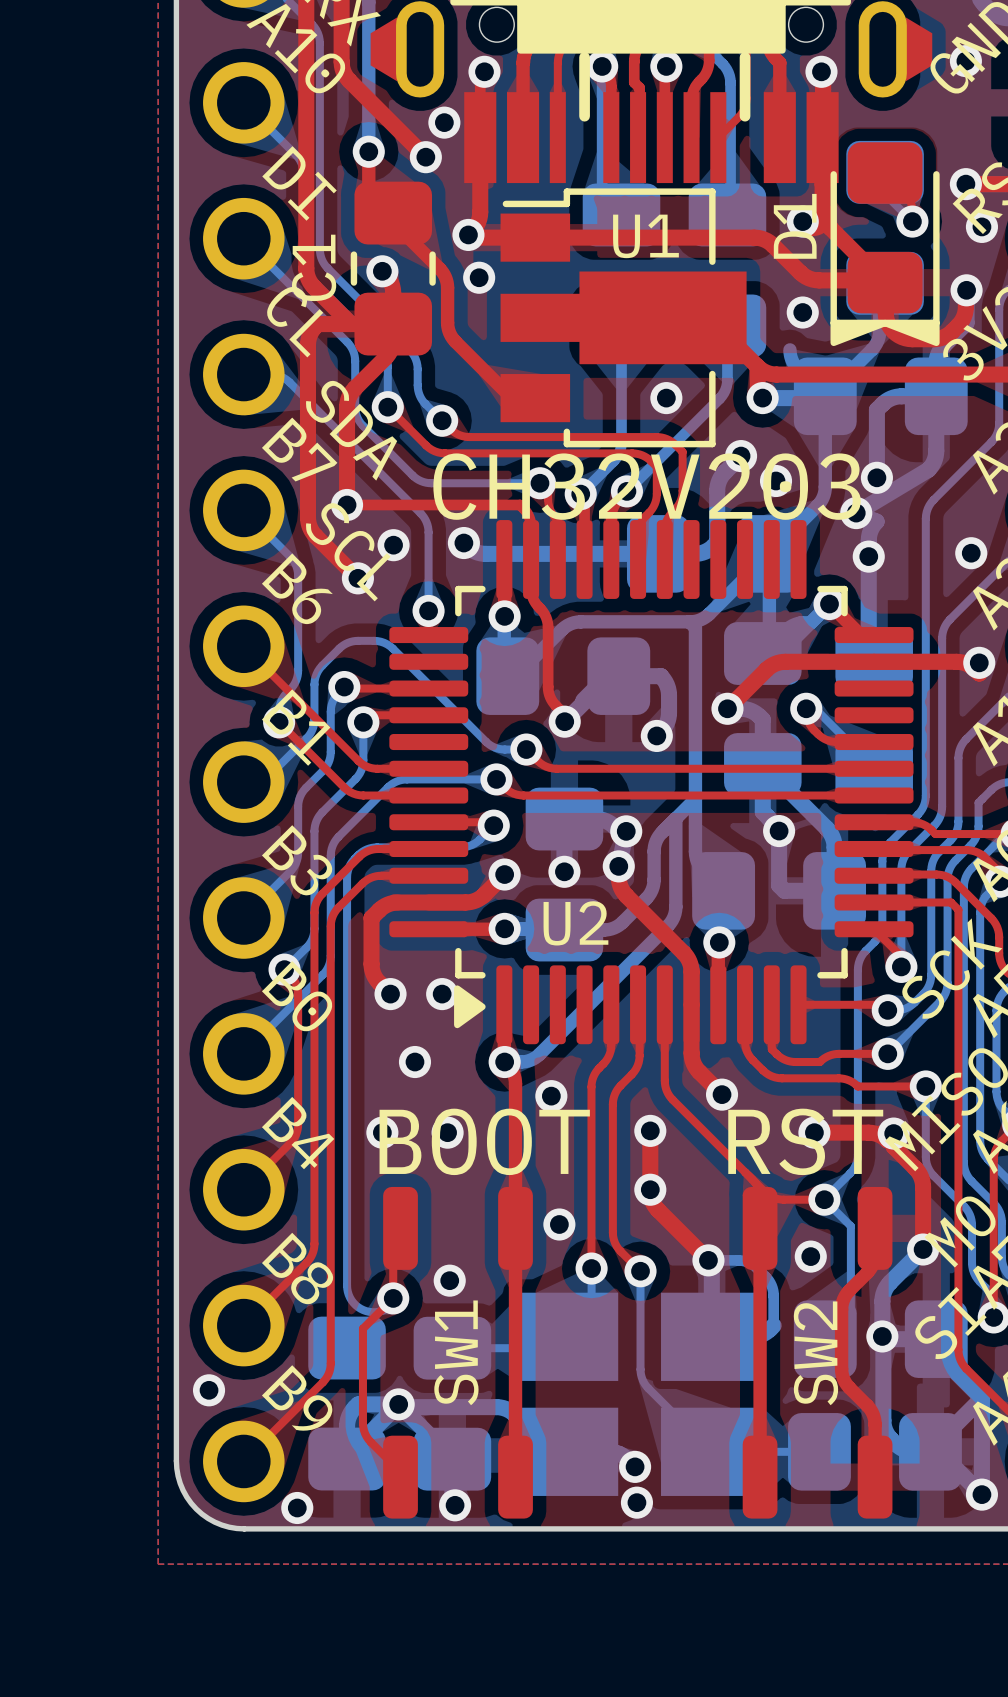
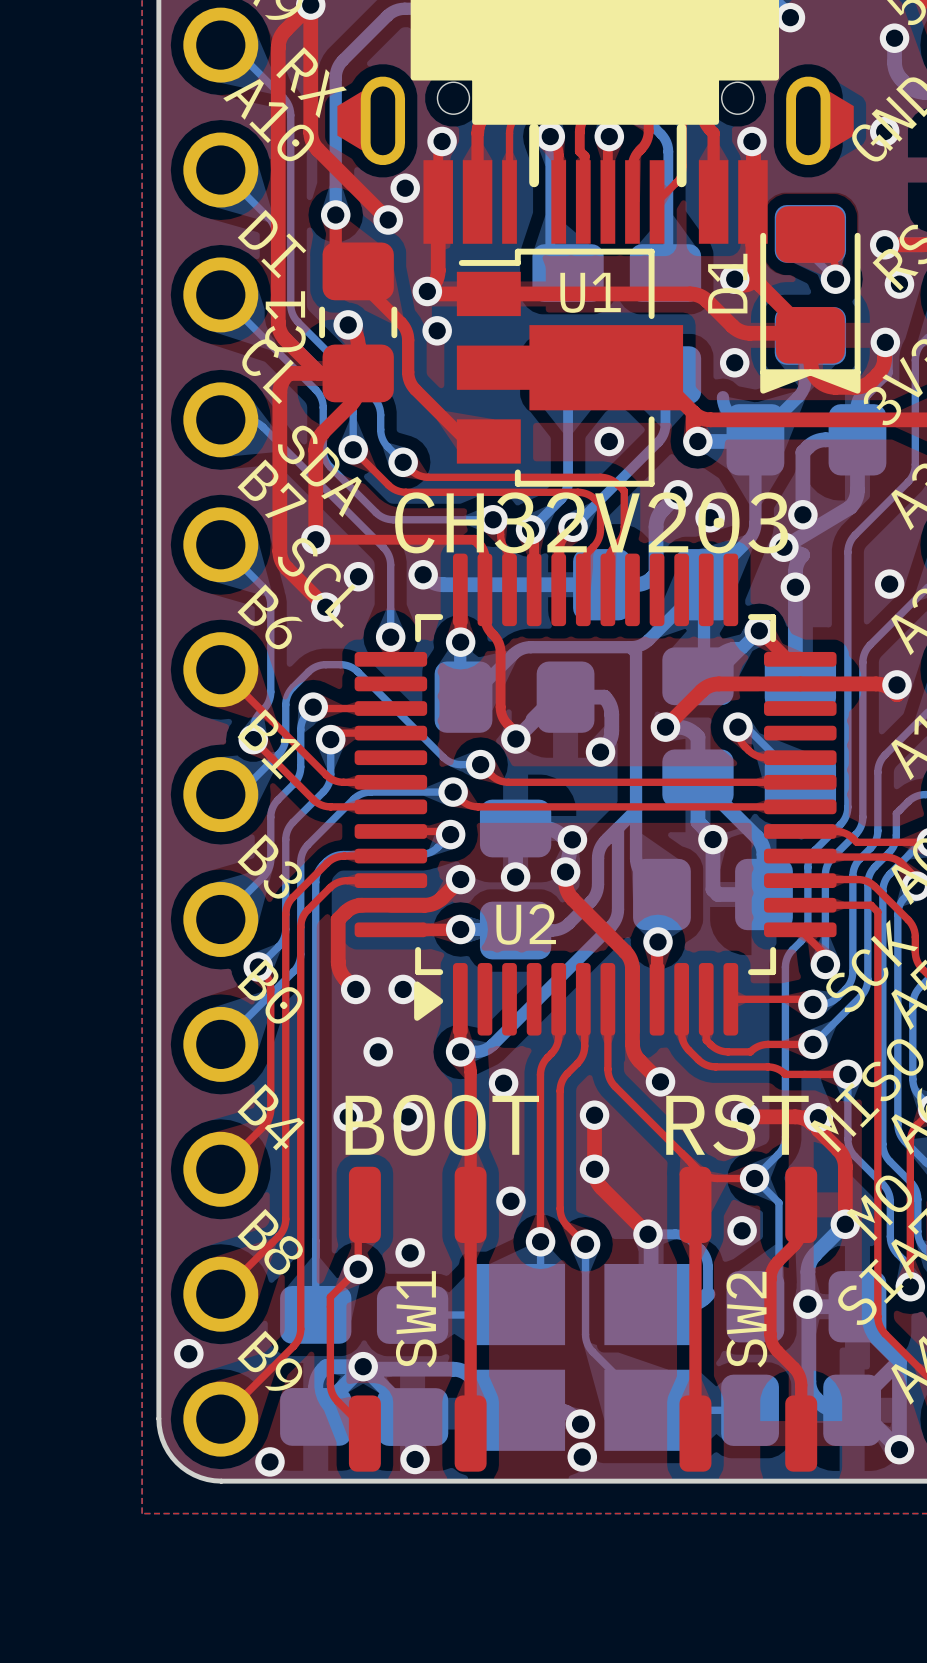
bottom track: (347, 1285) (351, 1300) (363, 1310) (379, 1311) (392, 1304) -> (315, 1257) (315, 1314)

